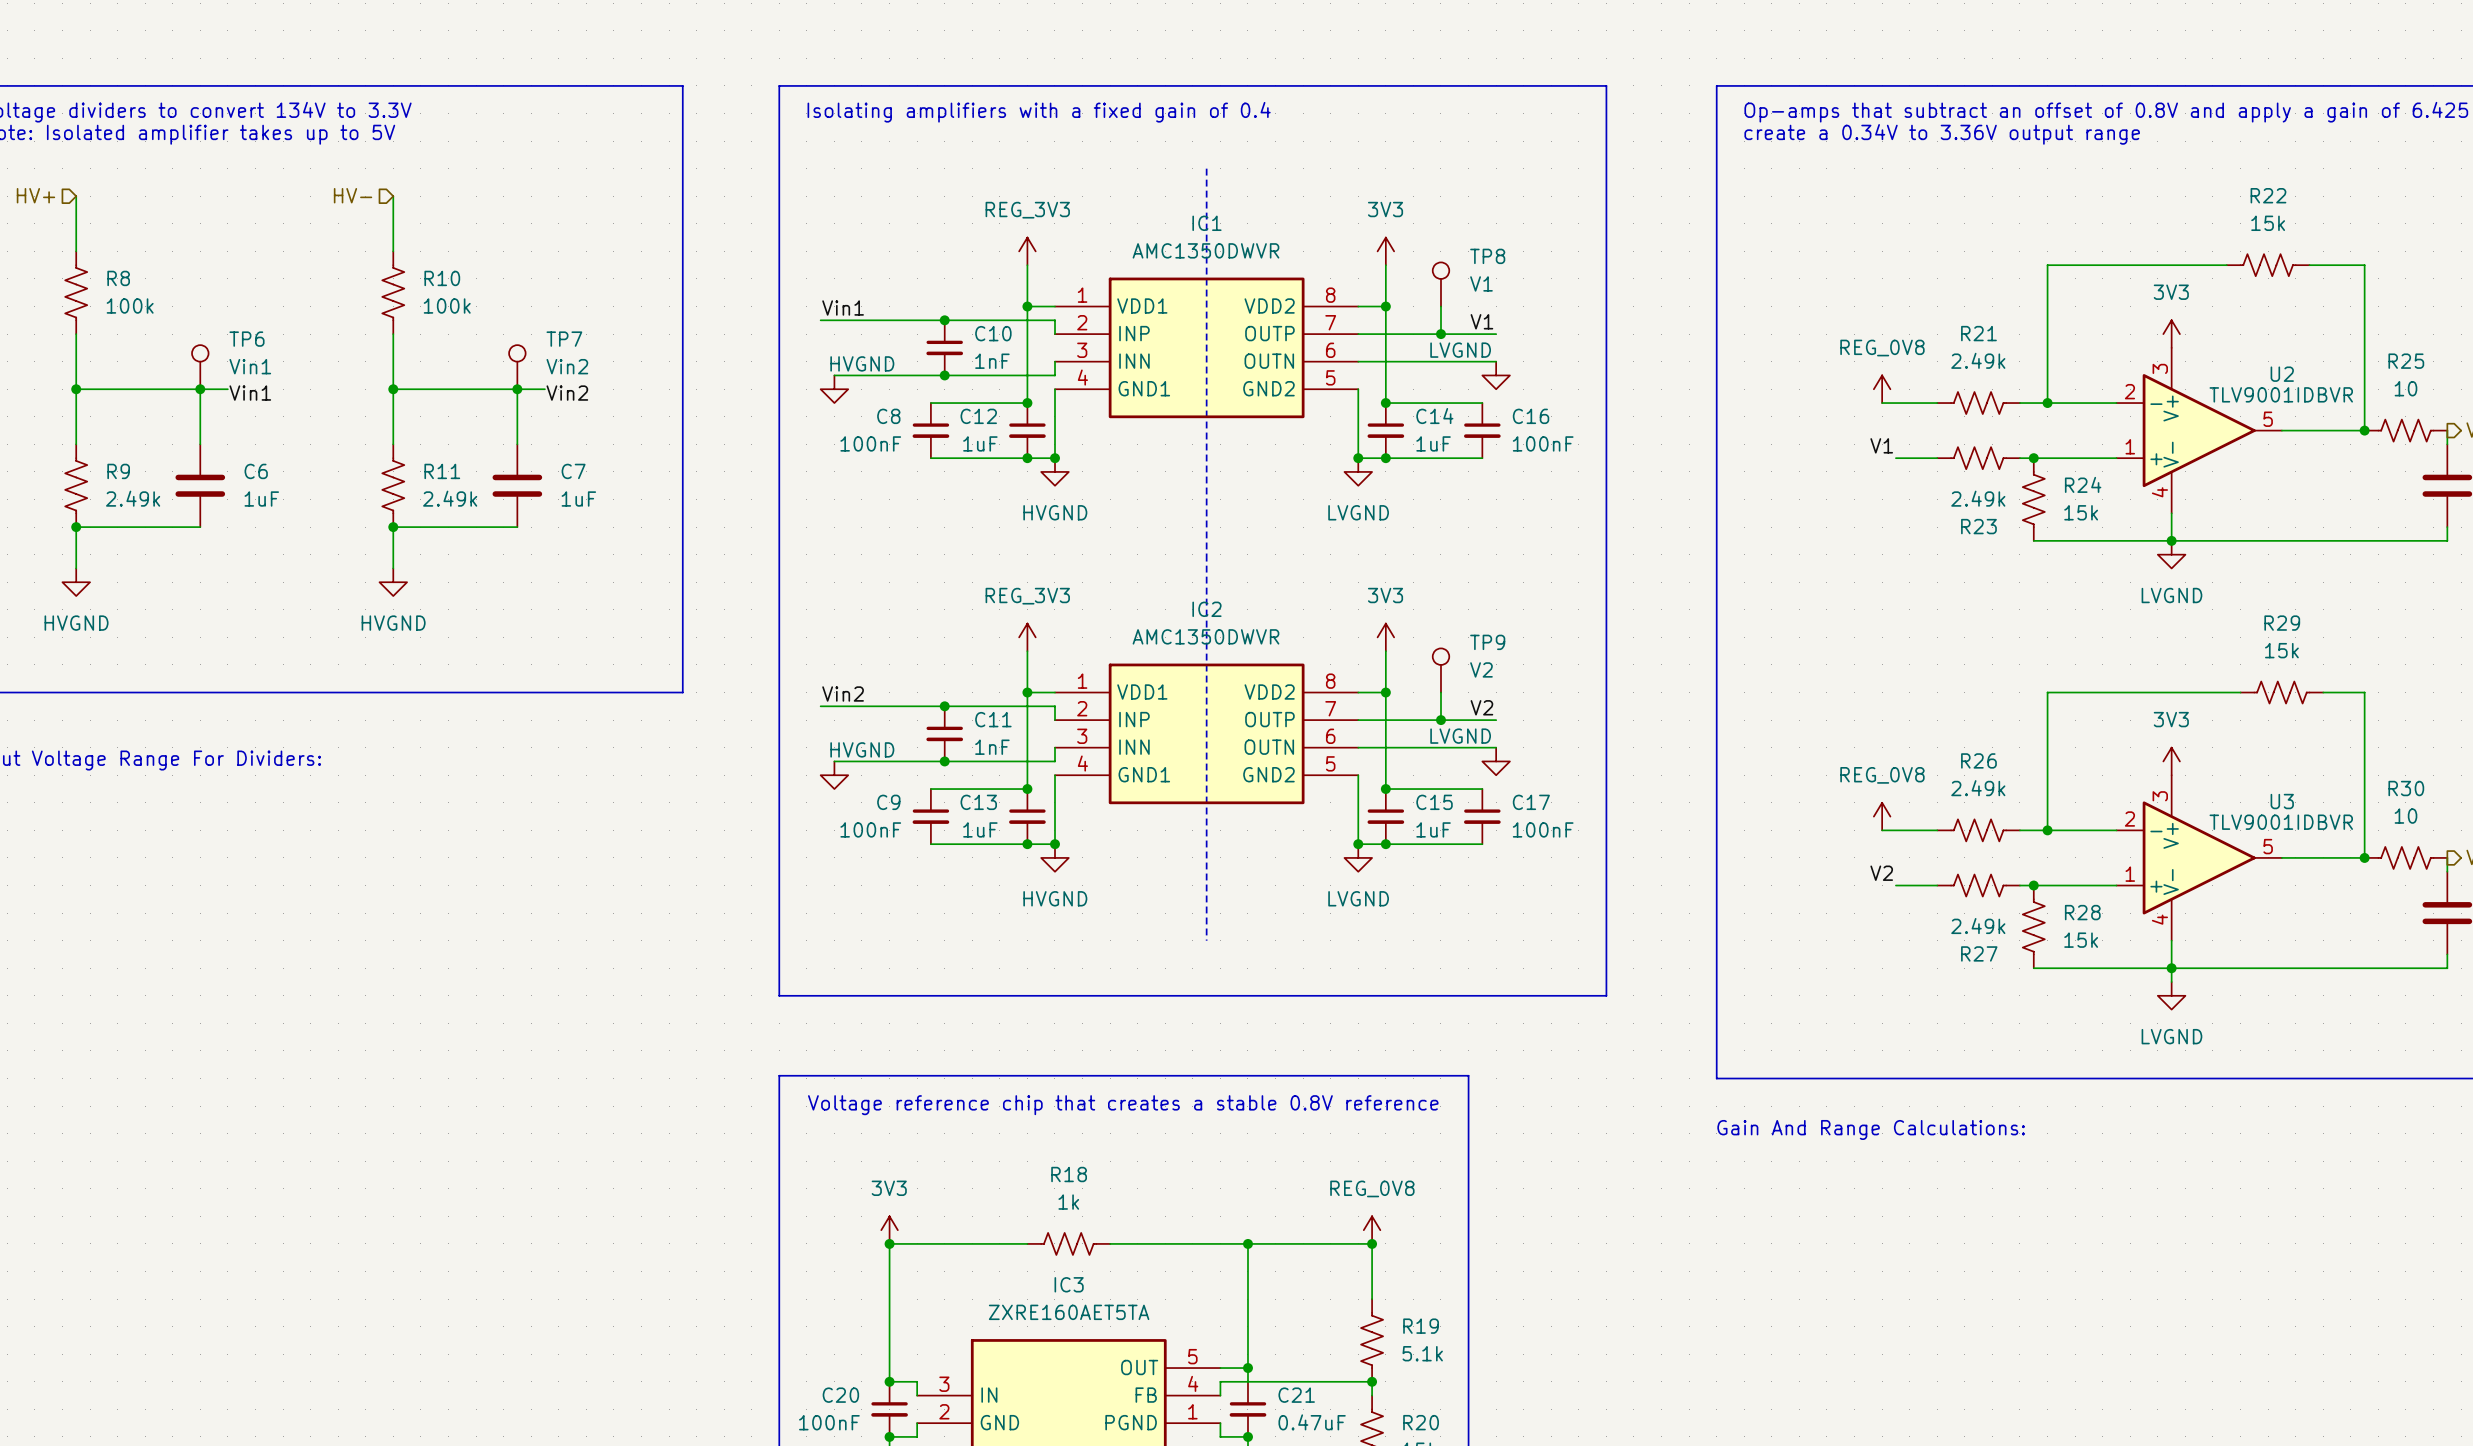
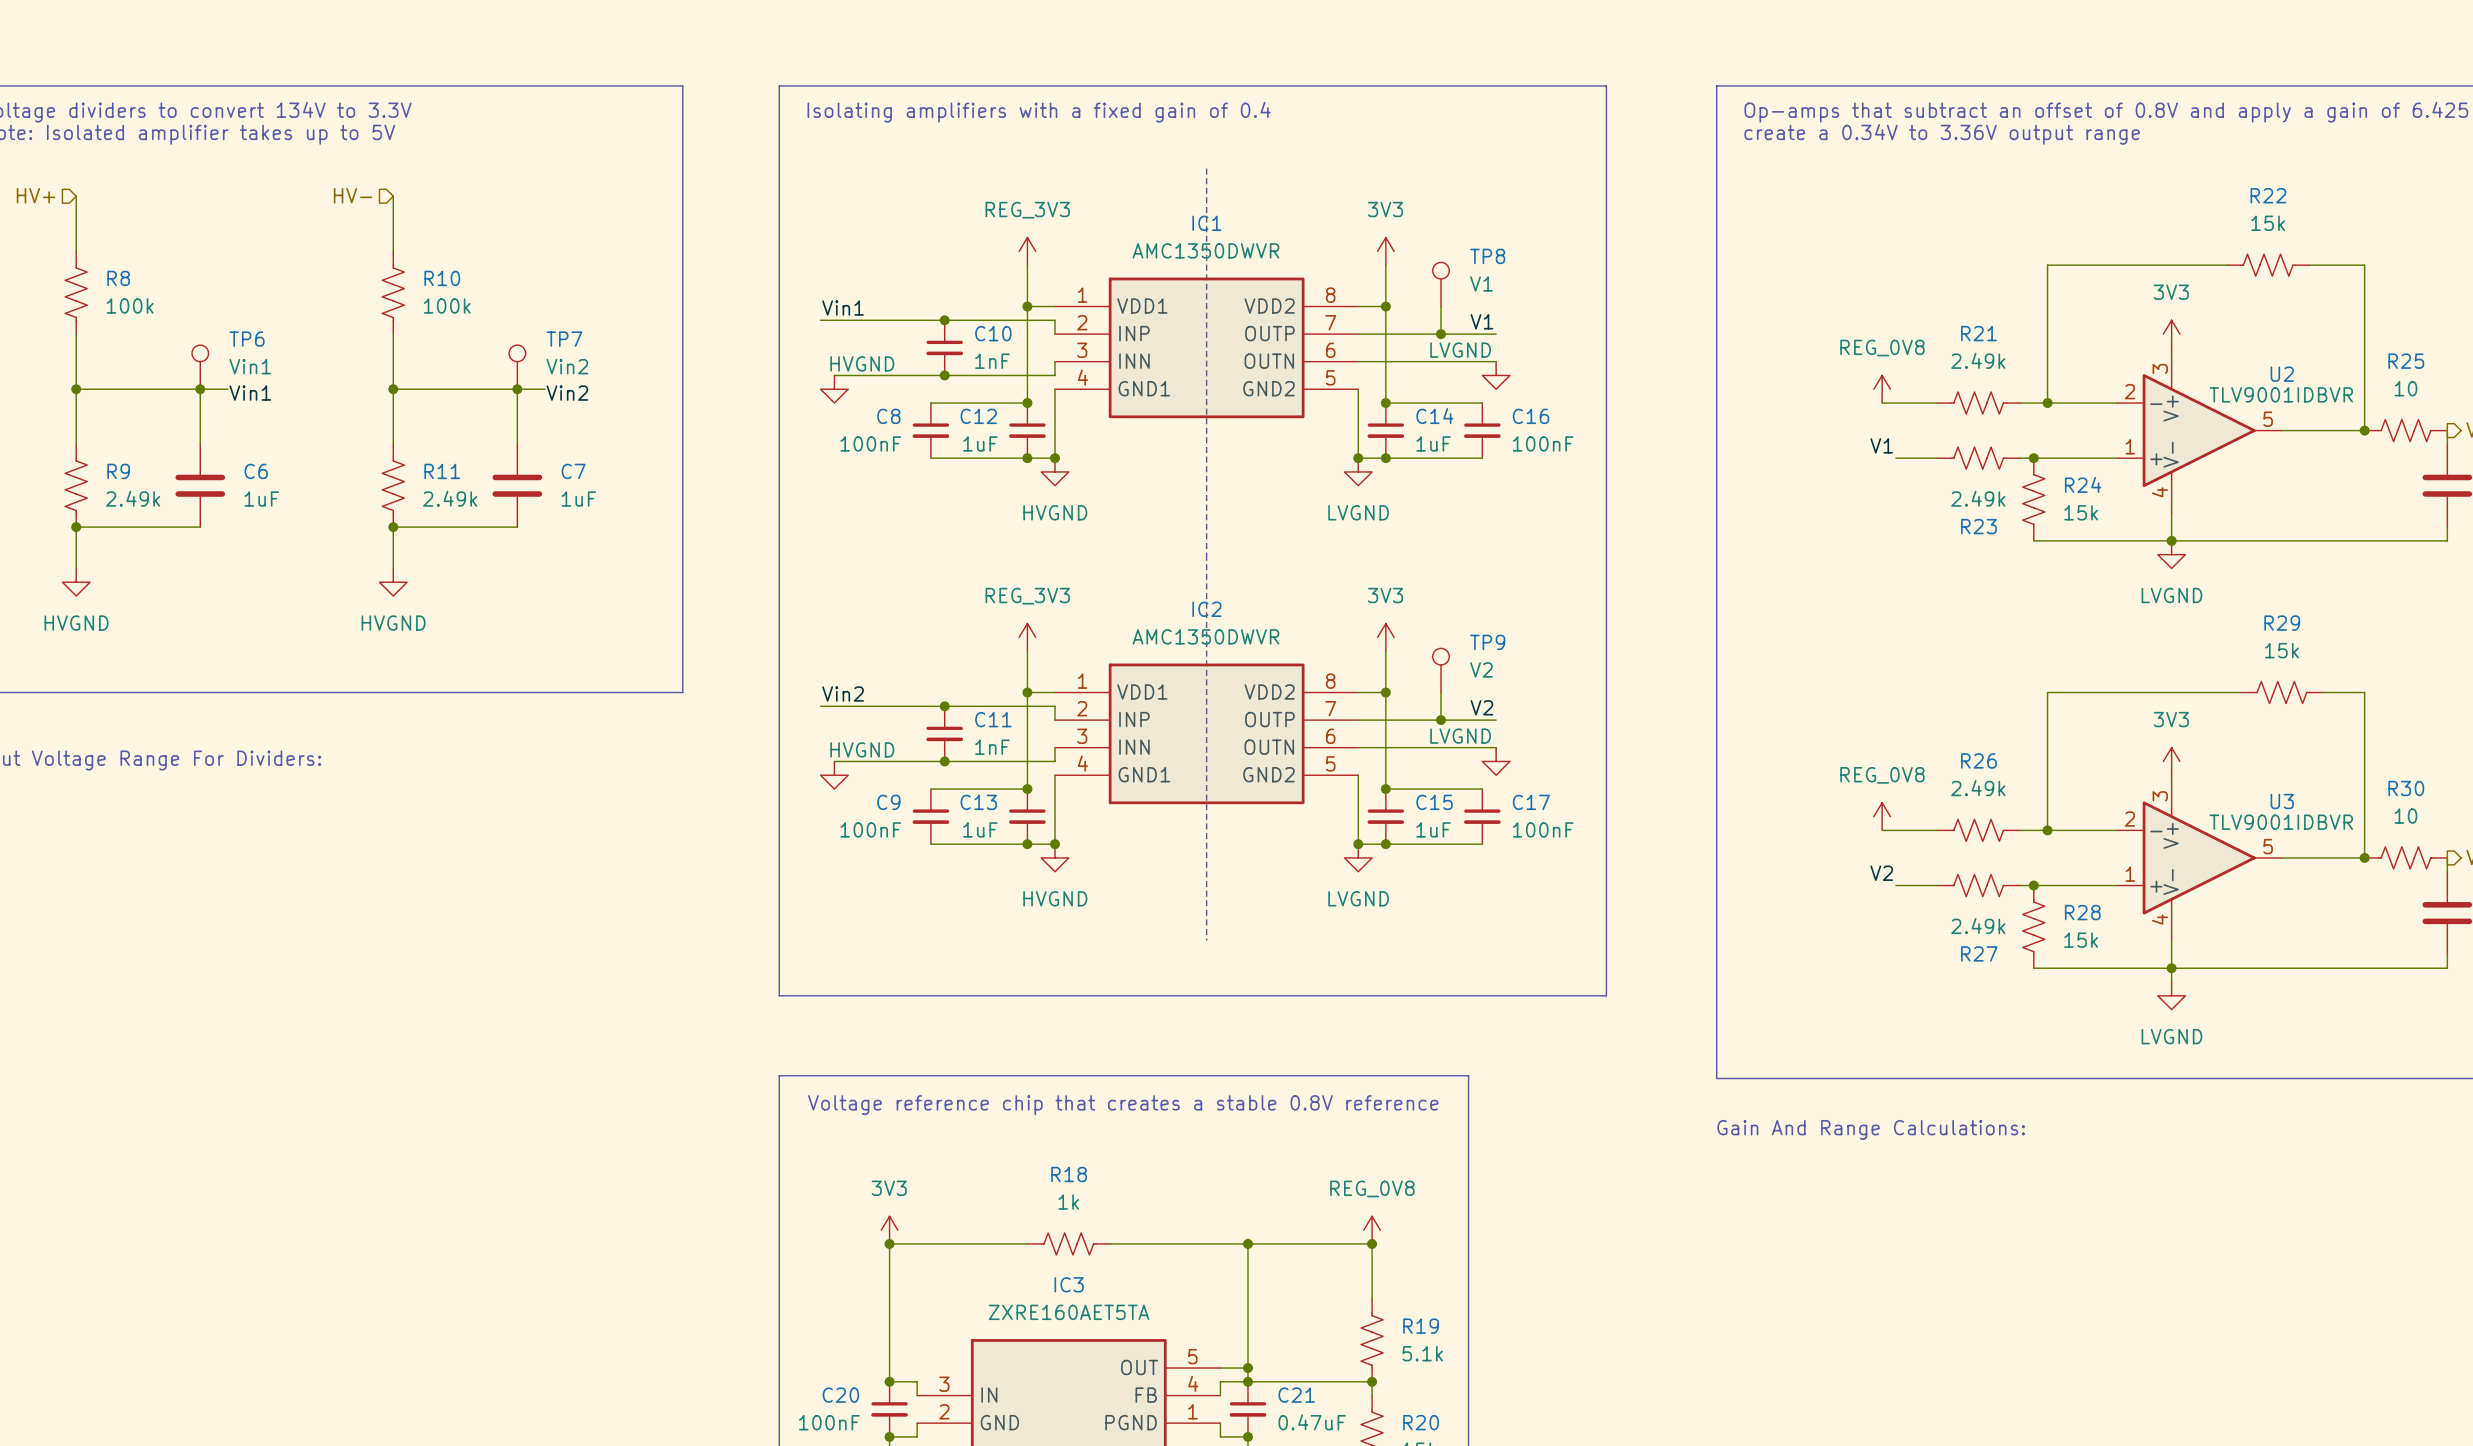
junction: none -> (1247, 1381)

